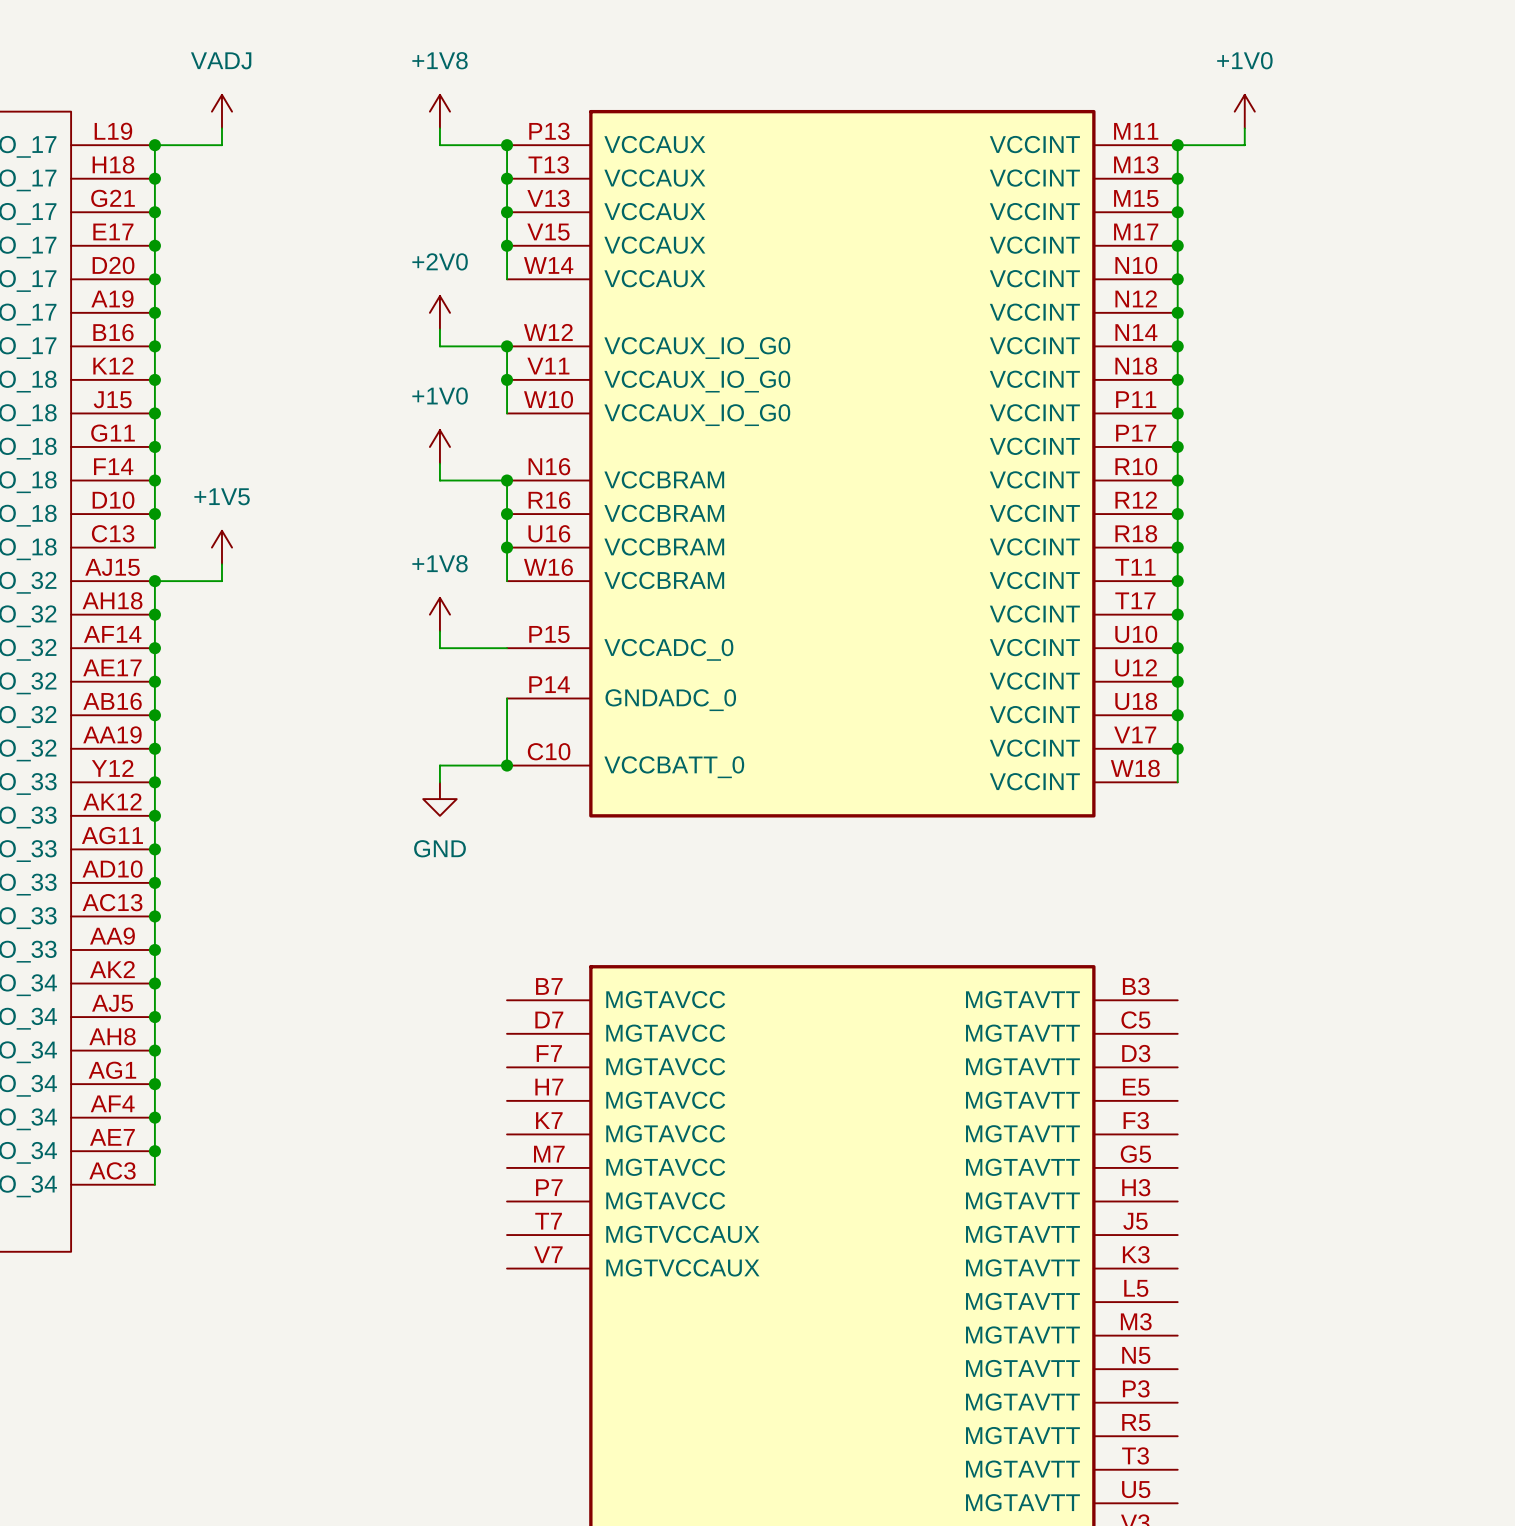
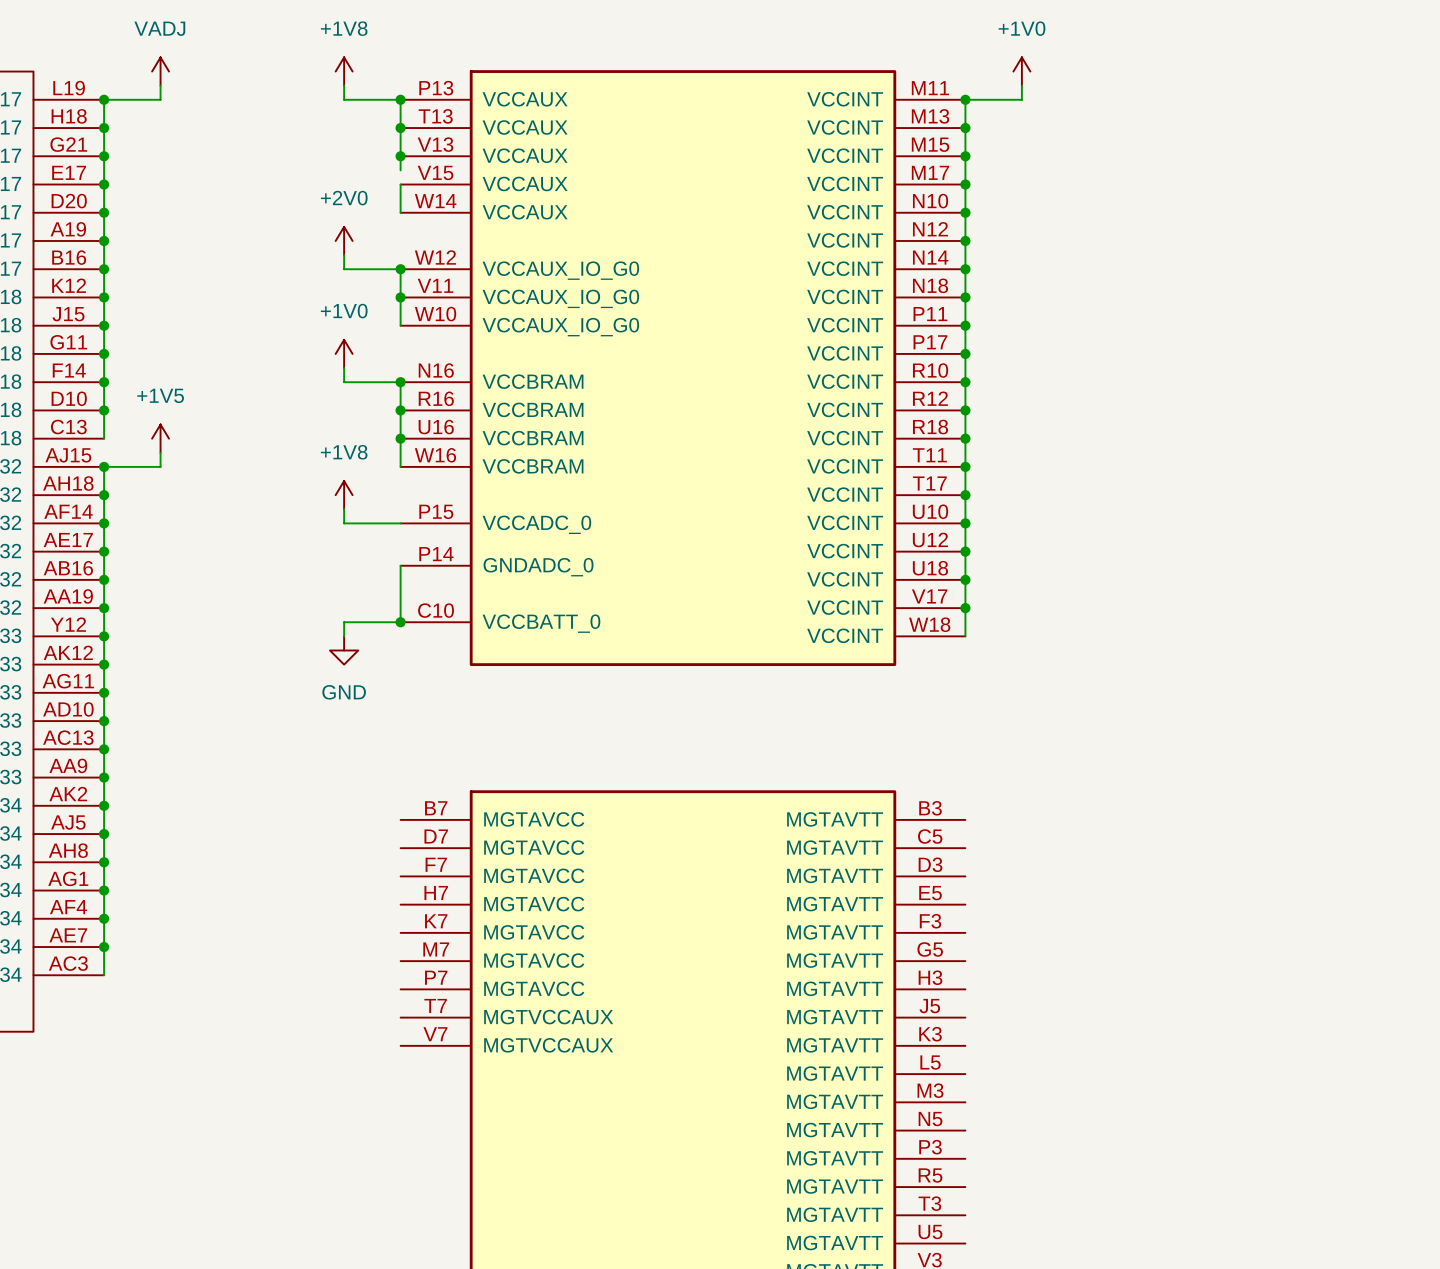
wire: (507, 229) (507, 245) -> none
junction: (507, 245) -> none

